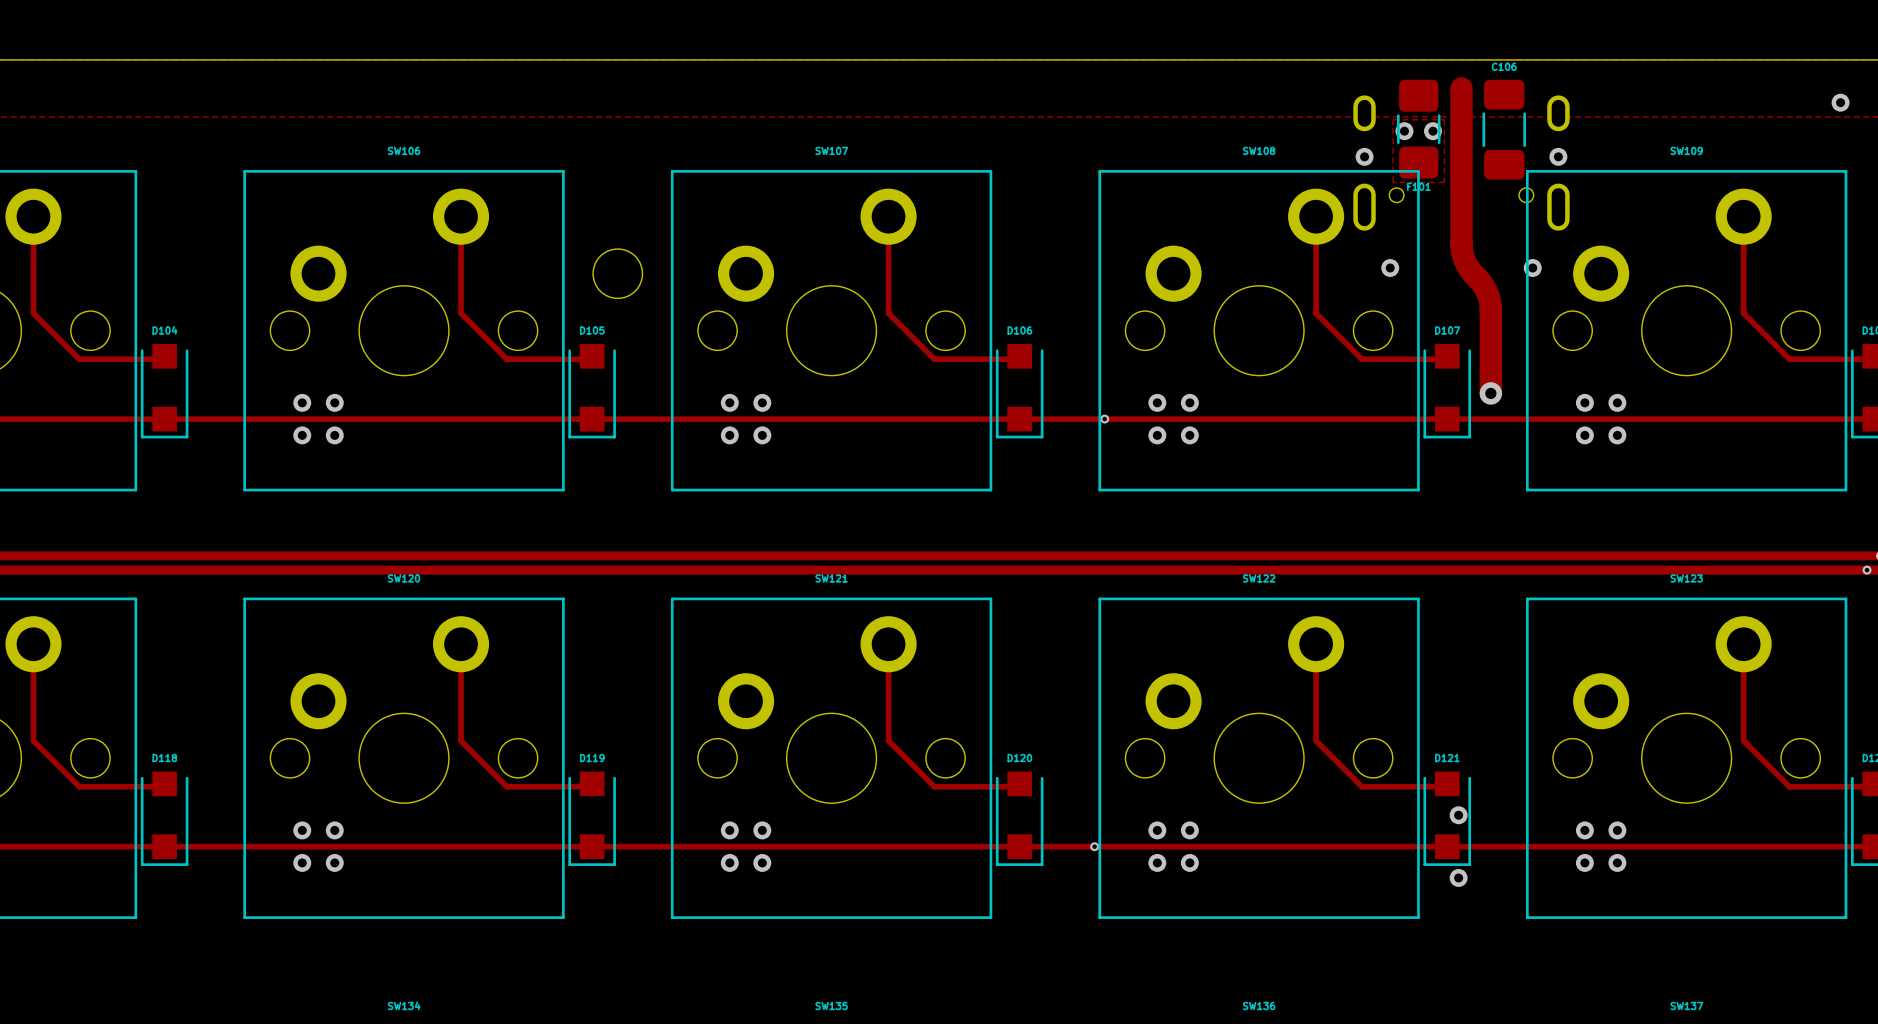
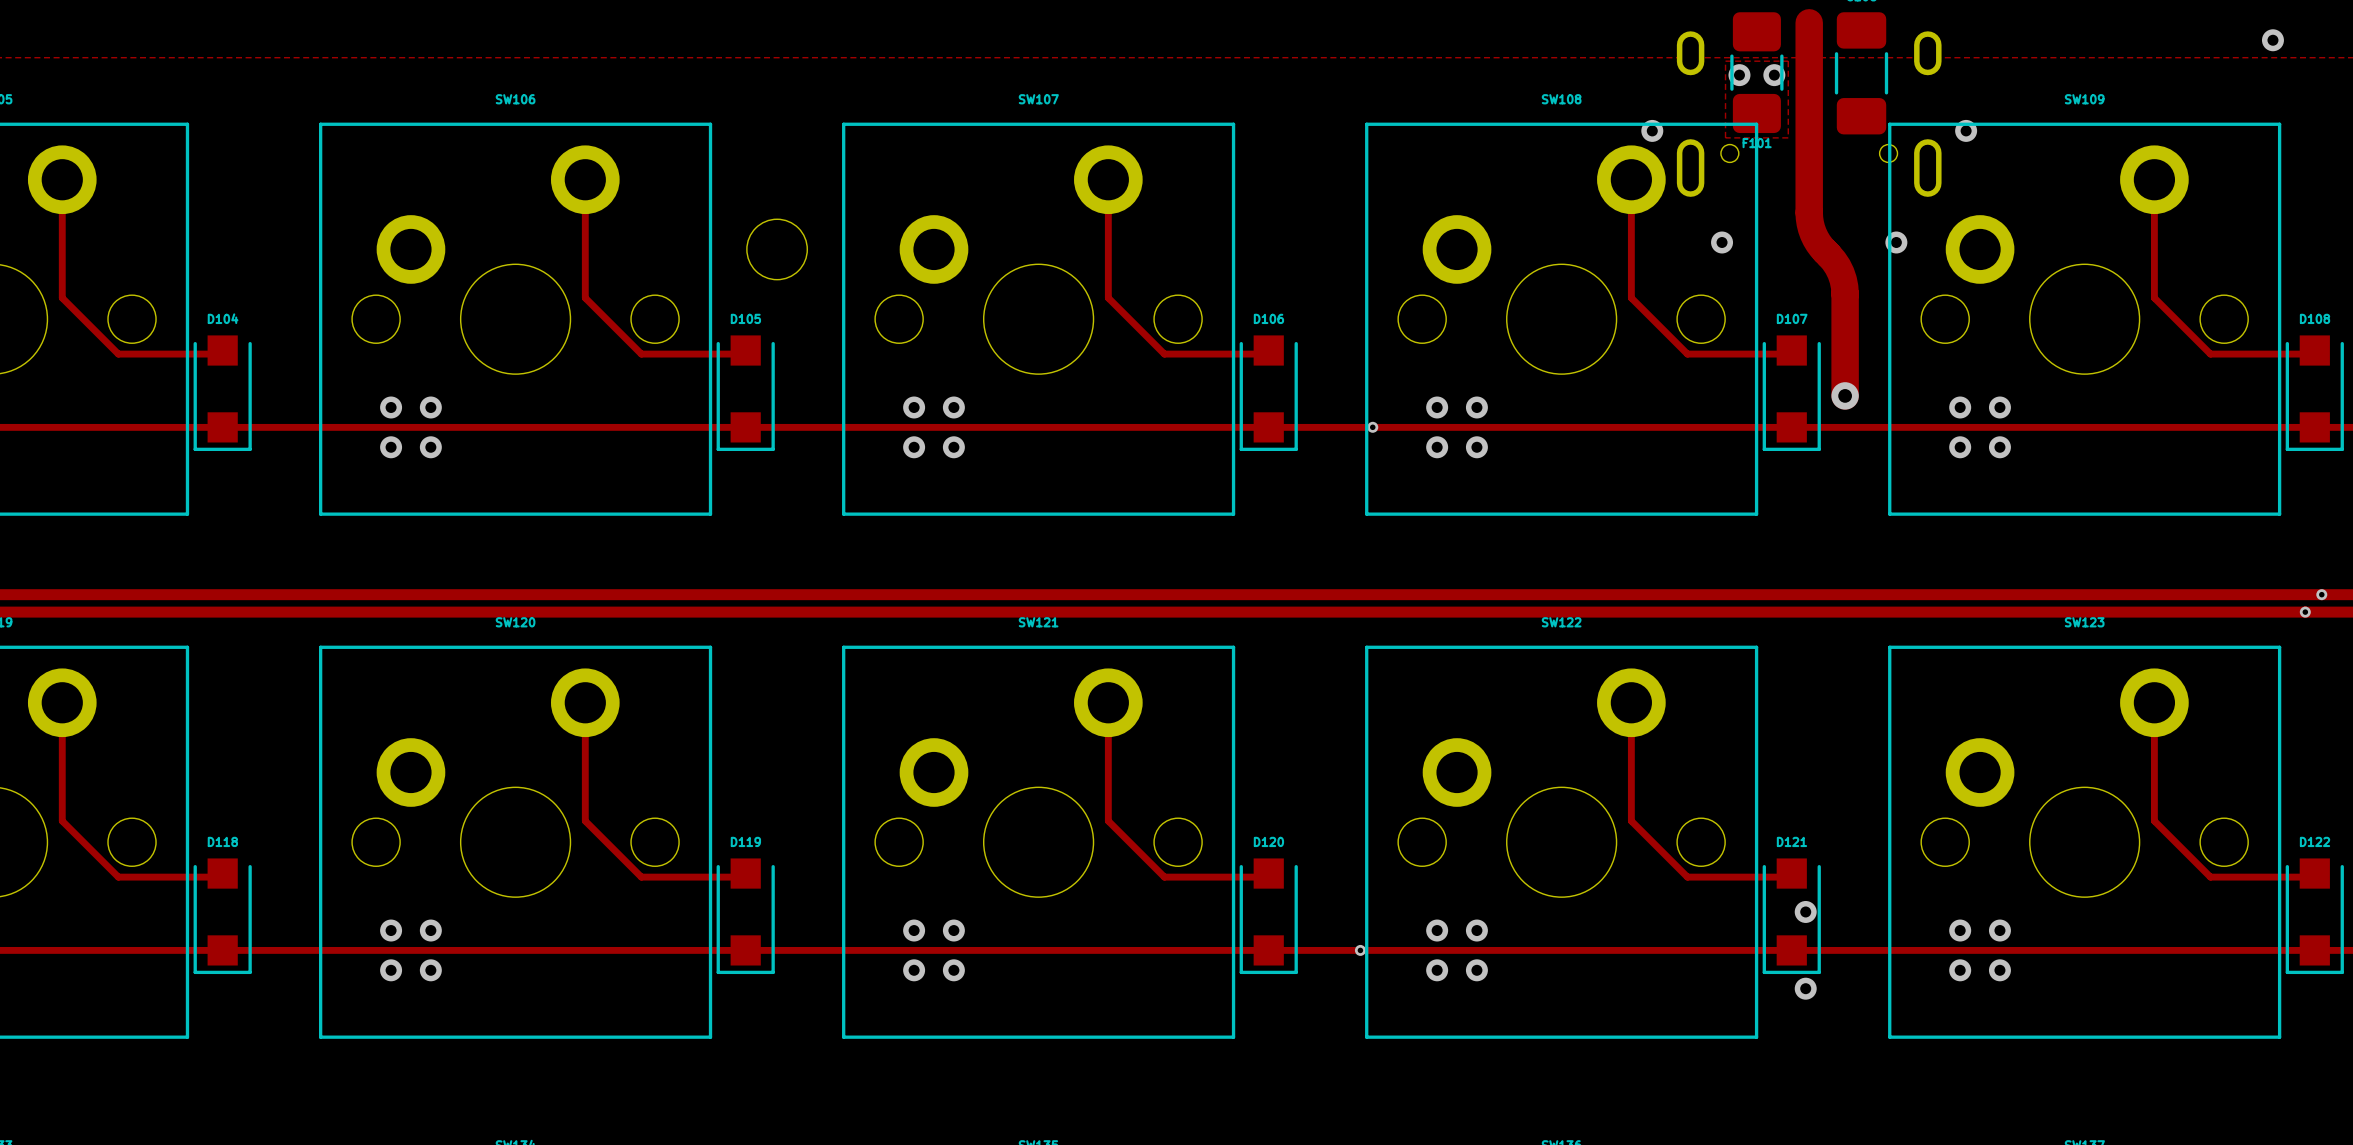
via position: (1364, 156) -> (1652, 130)
via position: (1558, 156) -> (1966, 130)

